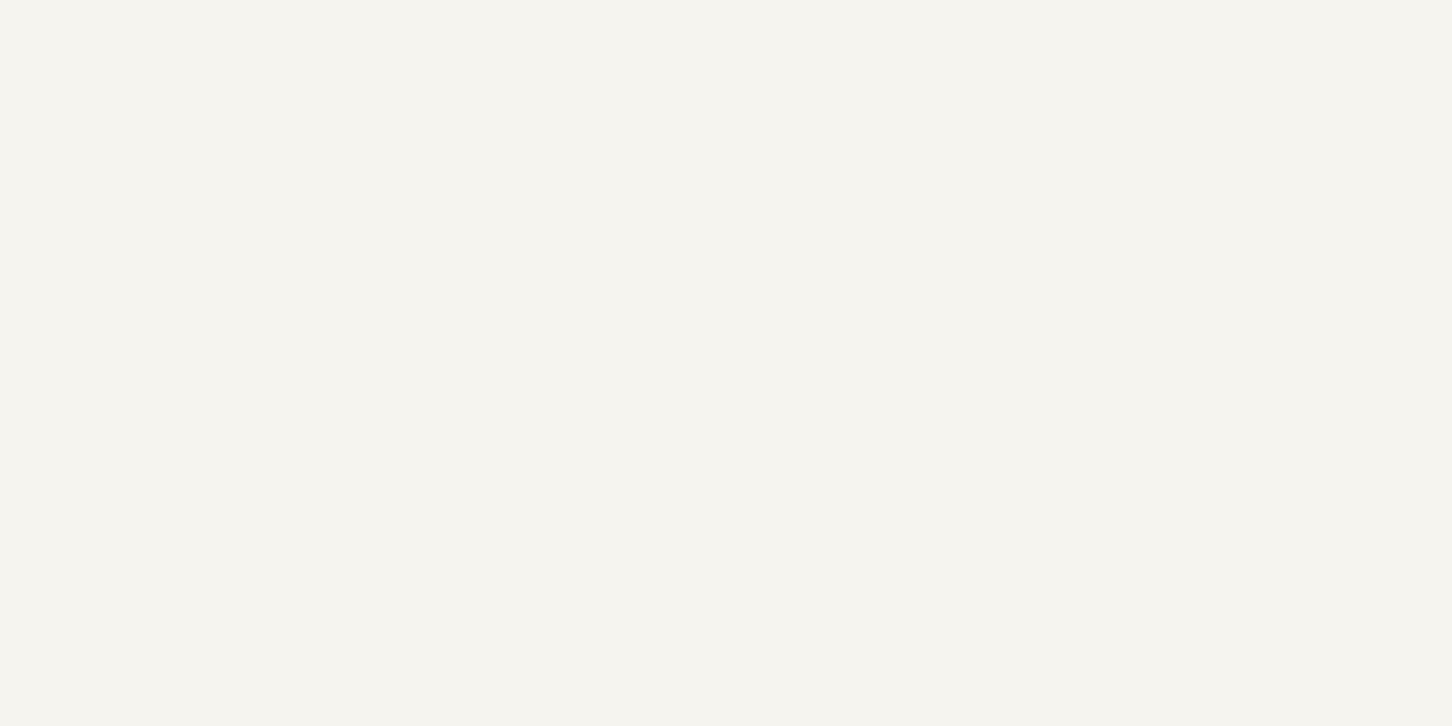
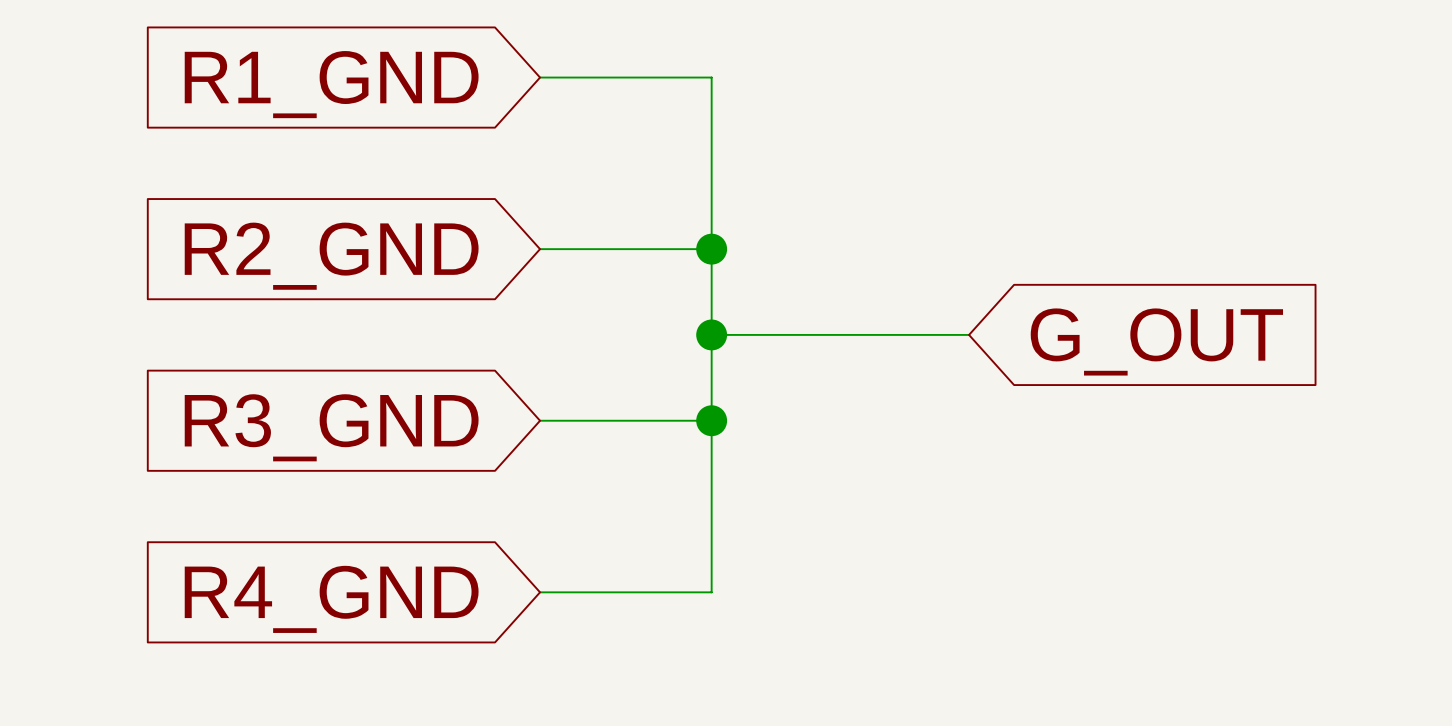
wire: none -> (540, 77) (711, 77) (711, 592) (540, 592)
global label: none -> R1_GND (331, 84)
wire: none -> (540, 249) (711, 249)
junction: none -> (711, 249)
global label: none -> R2_GND (331, 256)
wire: none -> (711, 334) (969, 334)
junction: none -> (711, 334)
global label: none -> G_OUT (1156, 341)
wire: none -> (540, 420) (711, 420)
junction: none -> (711, 420)
global label: none -> R3_GND (331, 427)
global label: none -> R4_GND (331, 599)

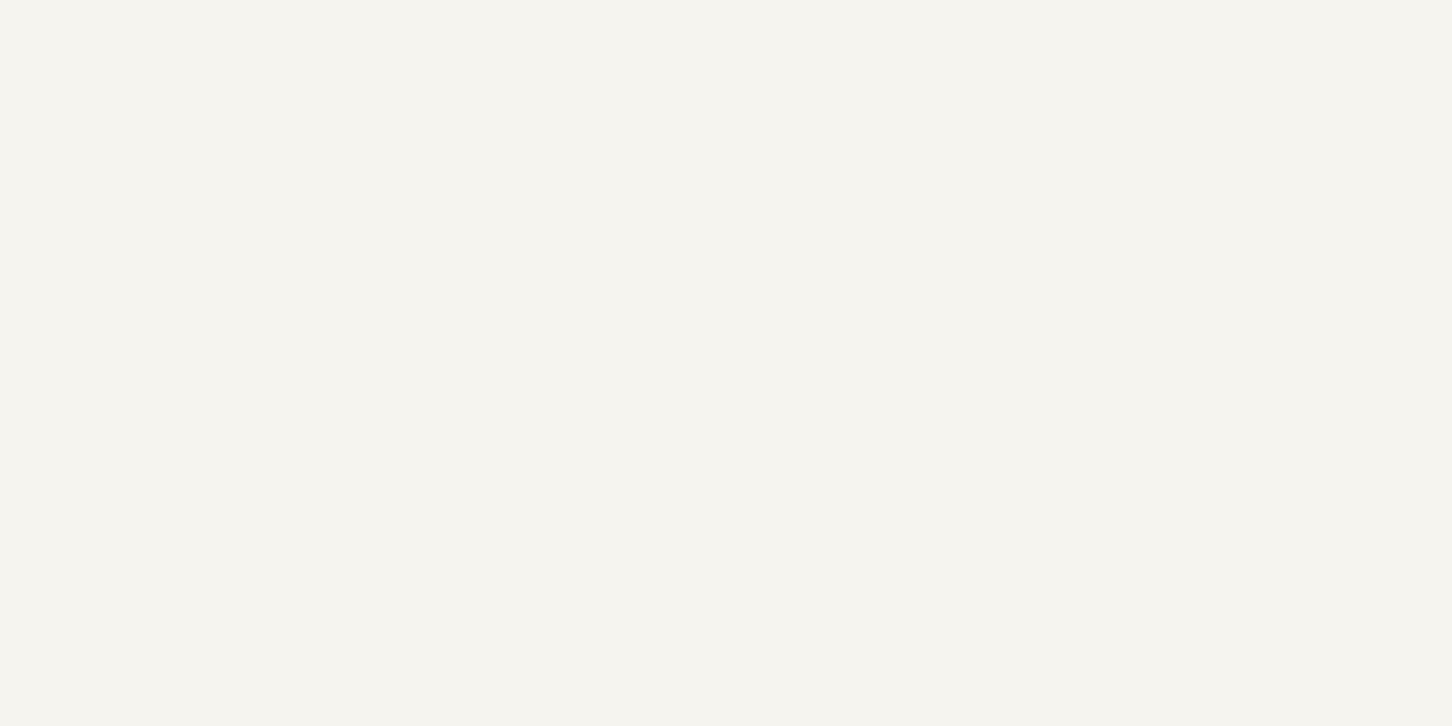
wire: (540, 77) (711, 77) (711, 592) (540, 592) -> none
global label: R1_GND (331, 84) -> none
wire: (540, 249) (711, 249) -> none
junction: (711, 249) -> none
global label: R2_GND (331, 256) -> none
wire: (711, 334) (969, 334) -> none
junction: (711, 334) -> none
global label: G_OUT (1156, 341) -> none
wire: (540, 420) (711, 420) -> none
junction: (711, 420) -> none
global label: R3_GND (331, 427) -> none
global label: R4_GND (331, 599) -> none

